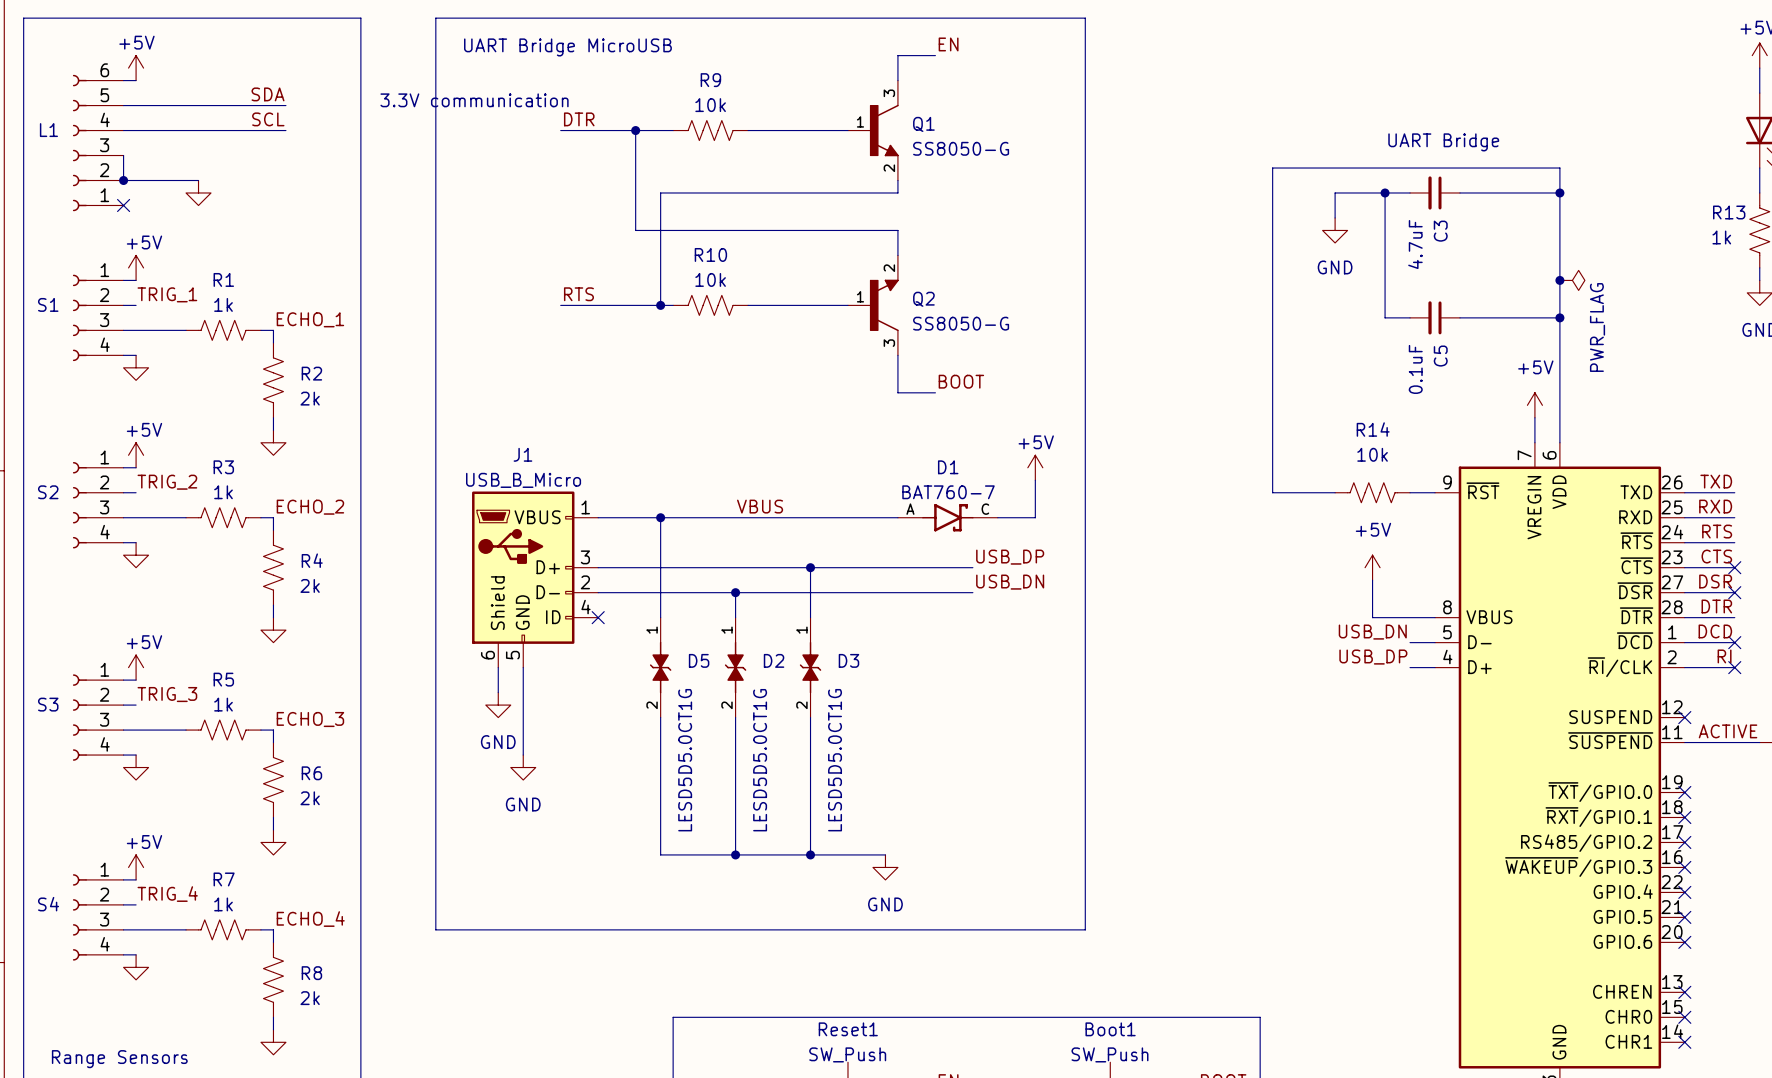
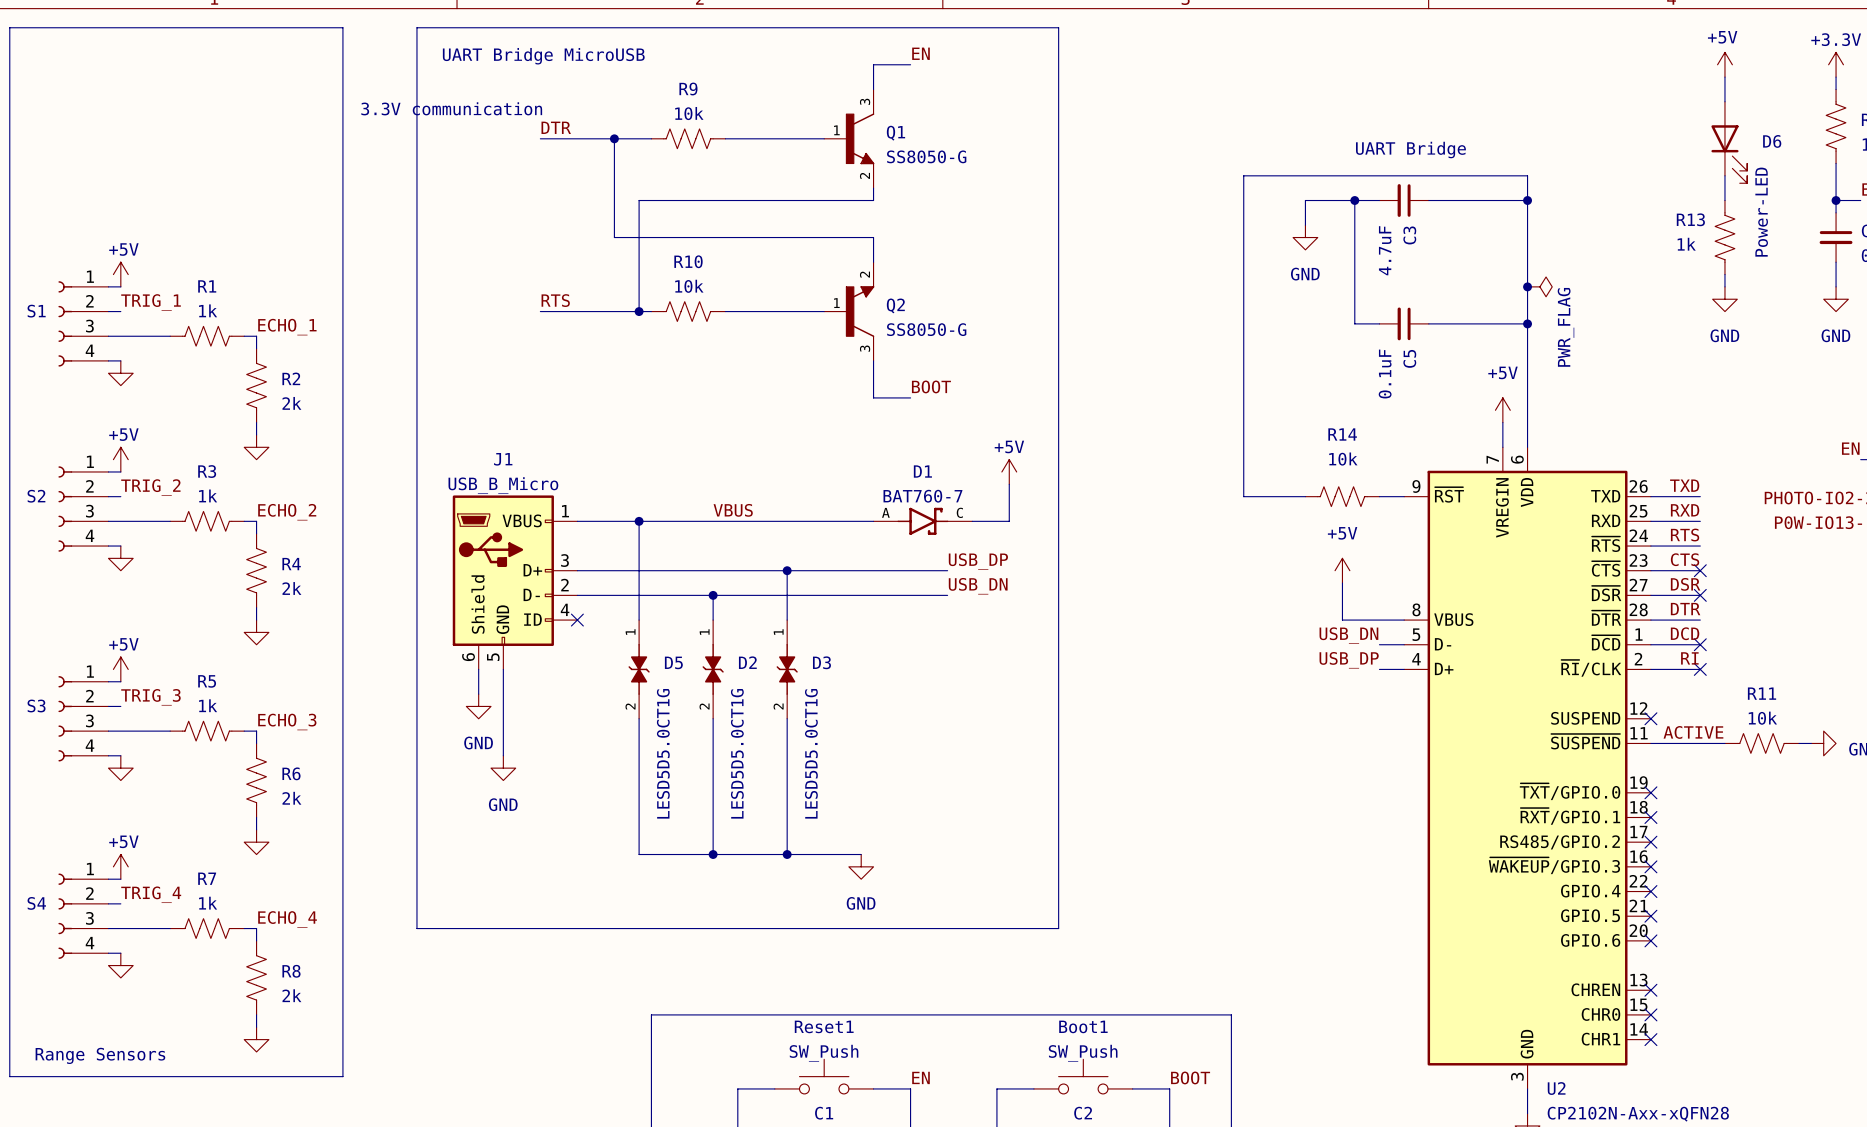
power symbol: +5V (136, 68) -> none
wire: (123, 80) (136, 80) -> none
label: SDA (268, 94) -> none
wire: (123, 105) (285, 105) -> none
label: SCL (268, 119) -> none
wire: (123, 130) (285, 130) -> none
L1: (98, 143) -> none
wire: (123, 155) (123, 180) (198, 180) -> none
junction: (123, 180) -> none
power symbol: (198, 192) -> none
no-connect mark: (123, 205) -> none

